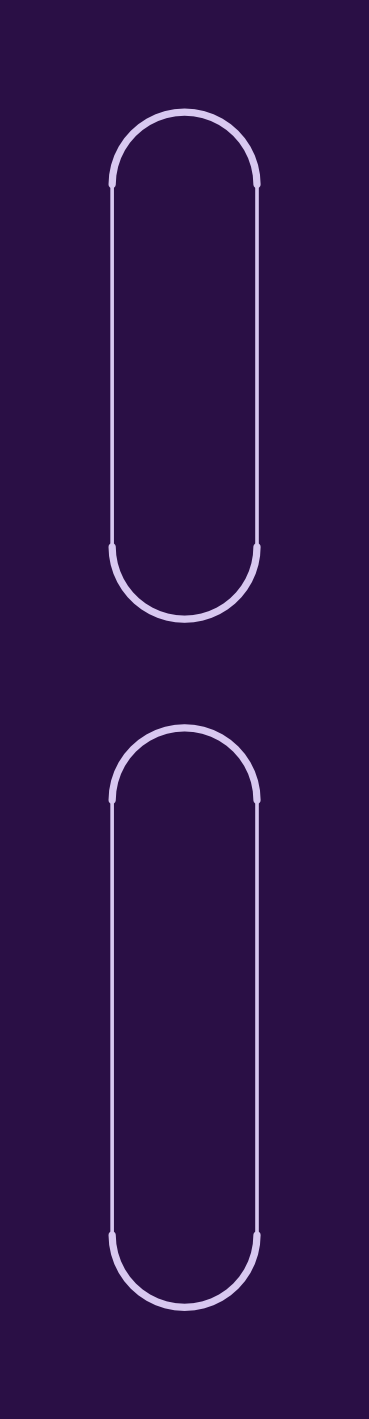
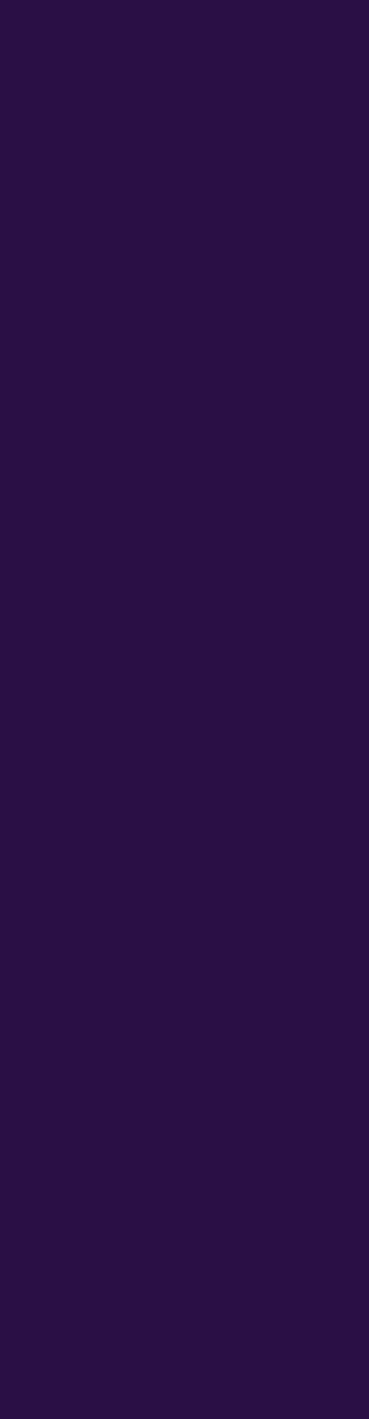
board edge: (112, 184) (112, 546) (114, 564) (124, 587) (136, 600) (150, 610) (175, 618) (201, 617) (218, 610) (238, 594) (252, 572) (256, 555) (257, 184) (254, 165) (242, 140) (220, 121) (203, 114) (175, 112) (148, 121) (133, 133) (117, 156) (112, 184) -> none
board edge: (112, 800) (112, 1244) (121, 1271) (140, 1292) (165, 1304) (194, 1306) (212, 1301) (235, 1286) (251, 1262) (256, 1244) (256, 790) (251, 772) (235, 749) (212, 733) (184, 727) (156, 733) (133, 749) (117, 772) (112, 800) -> none

